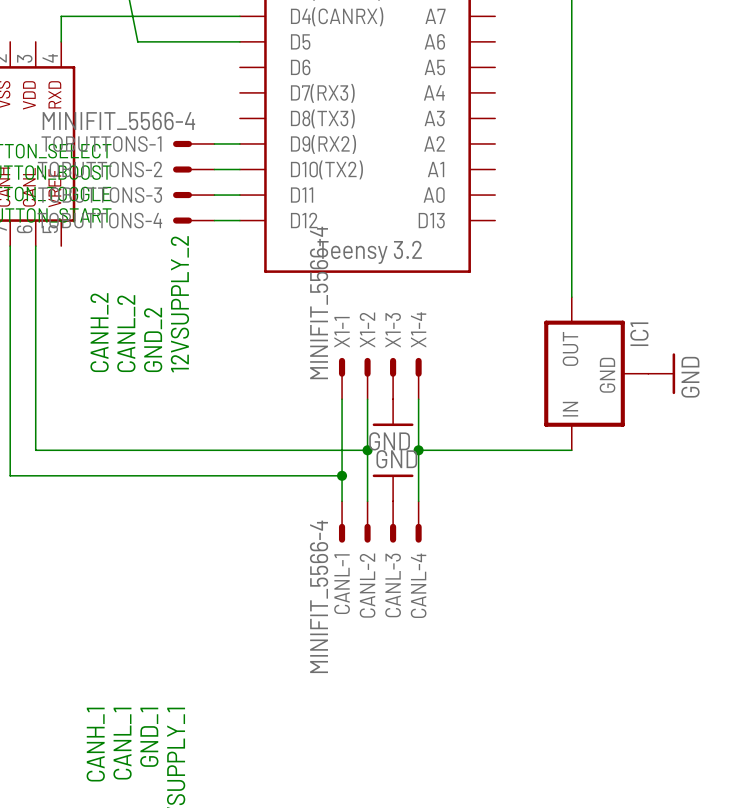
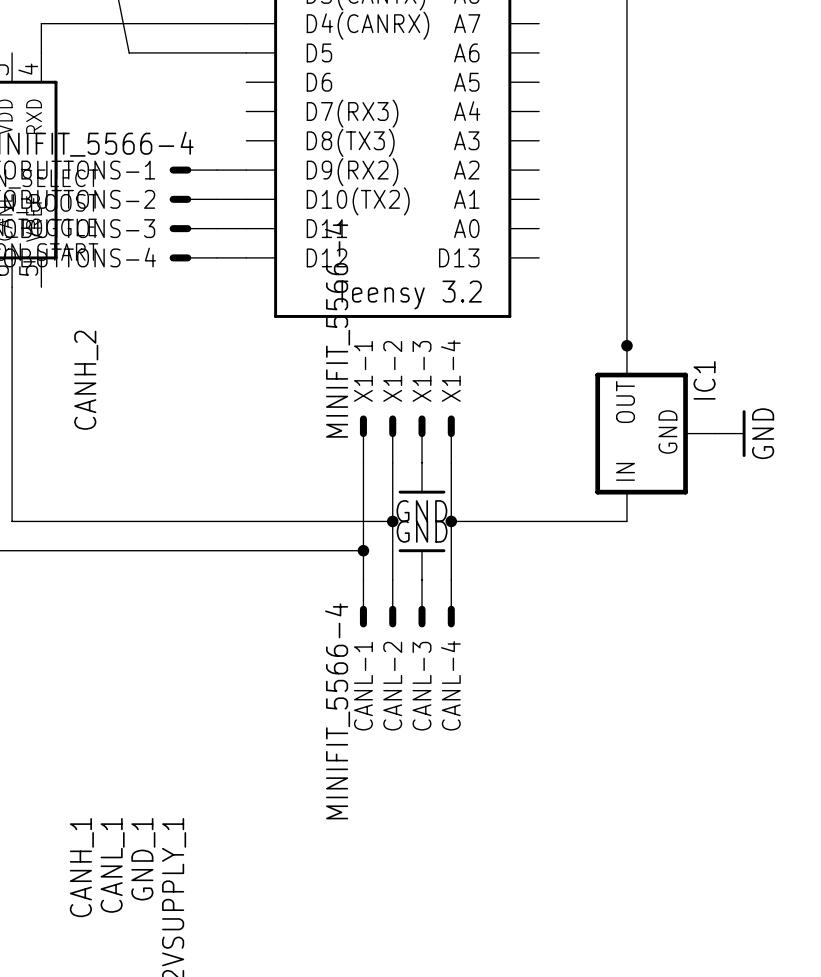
junction: none -> (626, 345)
text: 12VSUPPLY_2 (179, 304) -> none
text: CANL_2 (126, 333) -> none
text: GND_2 (153, 339) -> none

